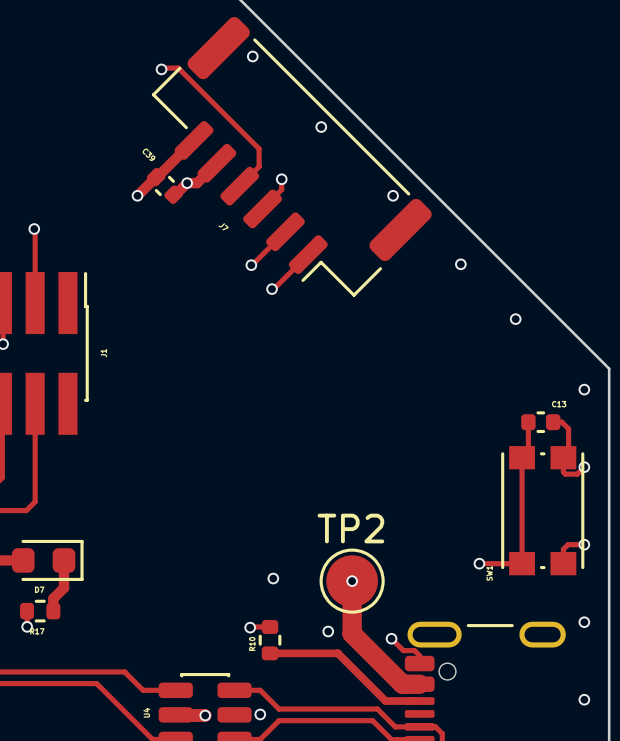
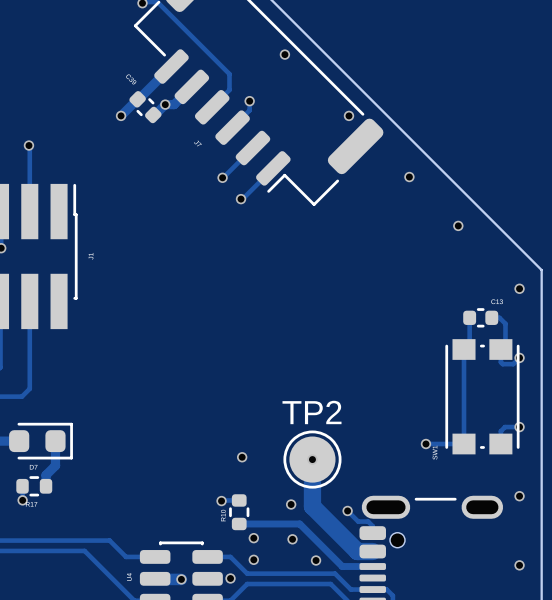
via: none -> (253, 538)
via: none -> (292, 539)
via: none -> (253, 559)
via: none -> (316, 560)

